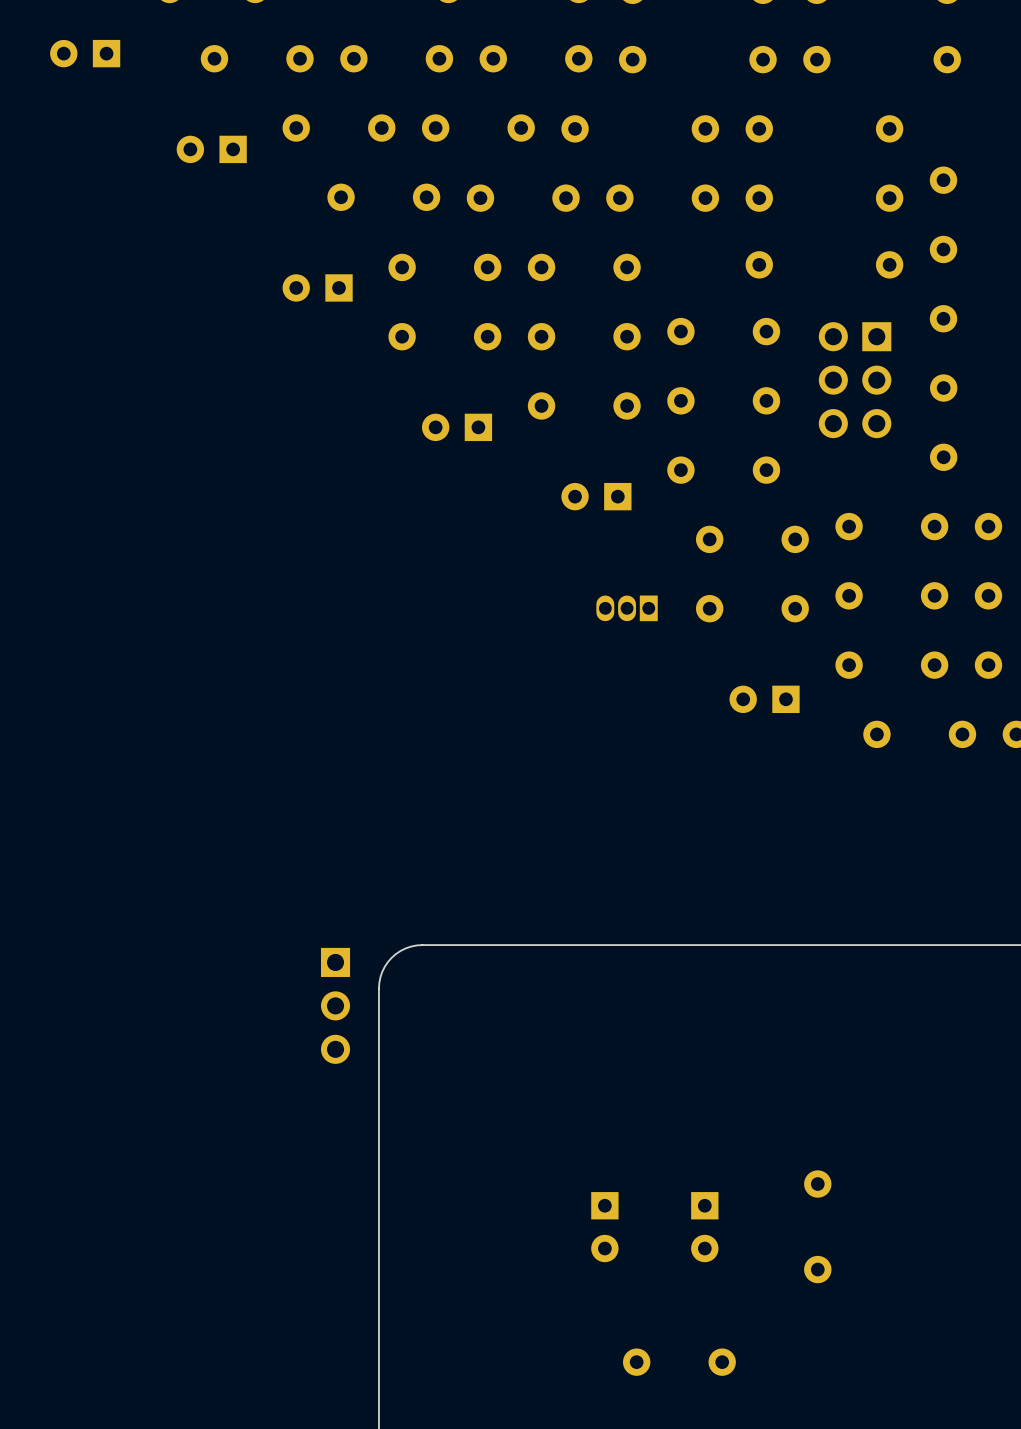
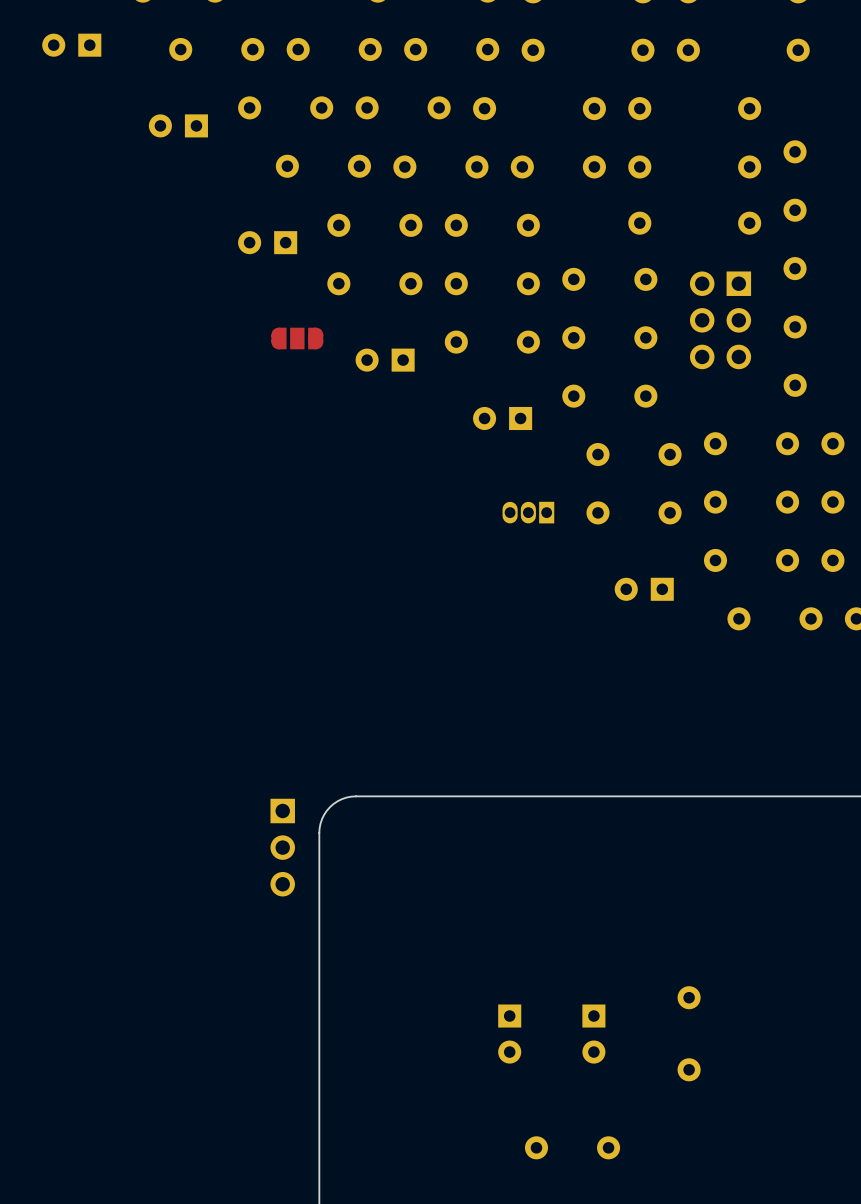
part: none -> (297, 338)

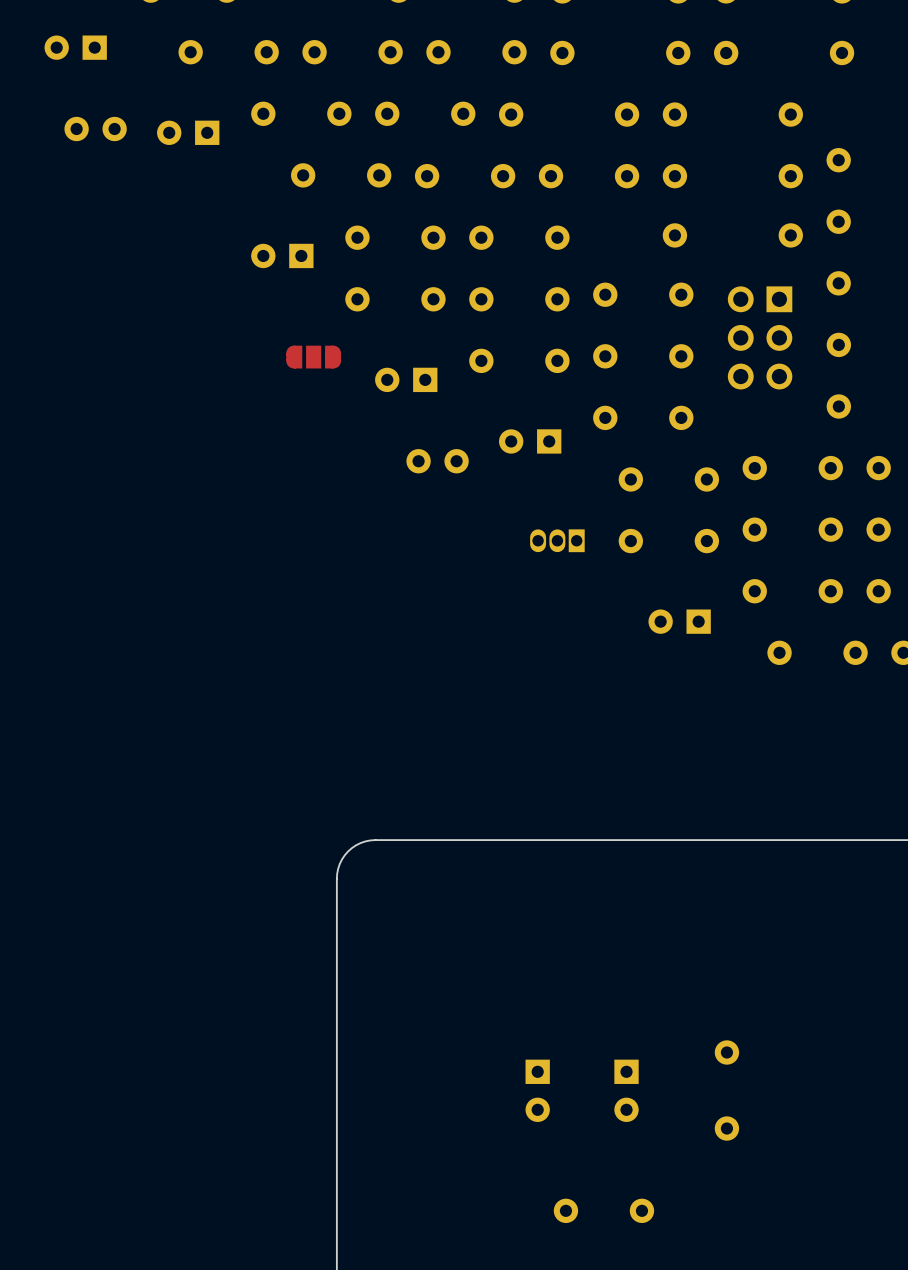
part: none -> (95, 129)
part: none -> (437, 461)
part: (282, 847) -> none

